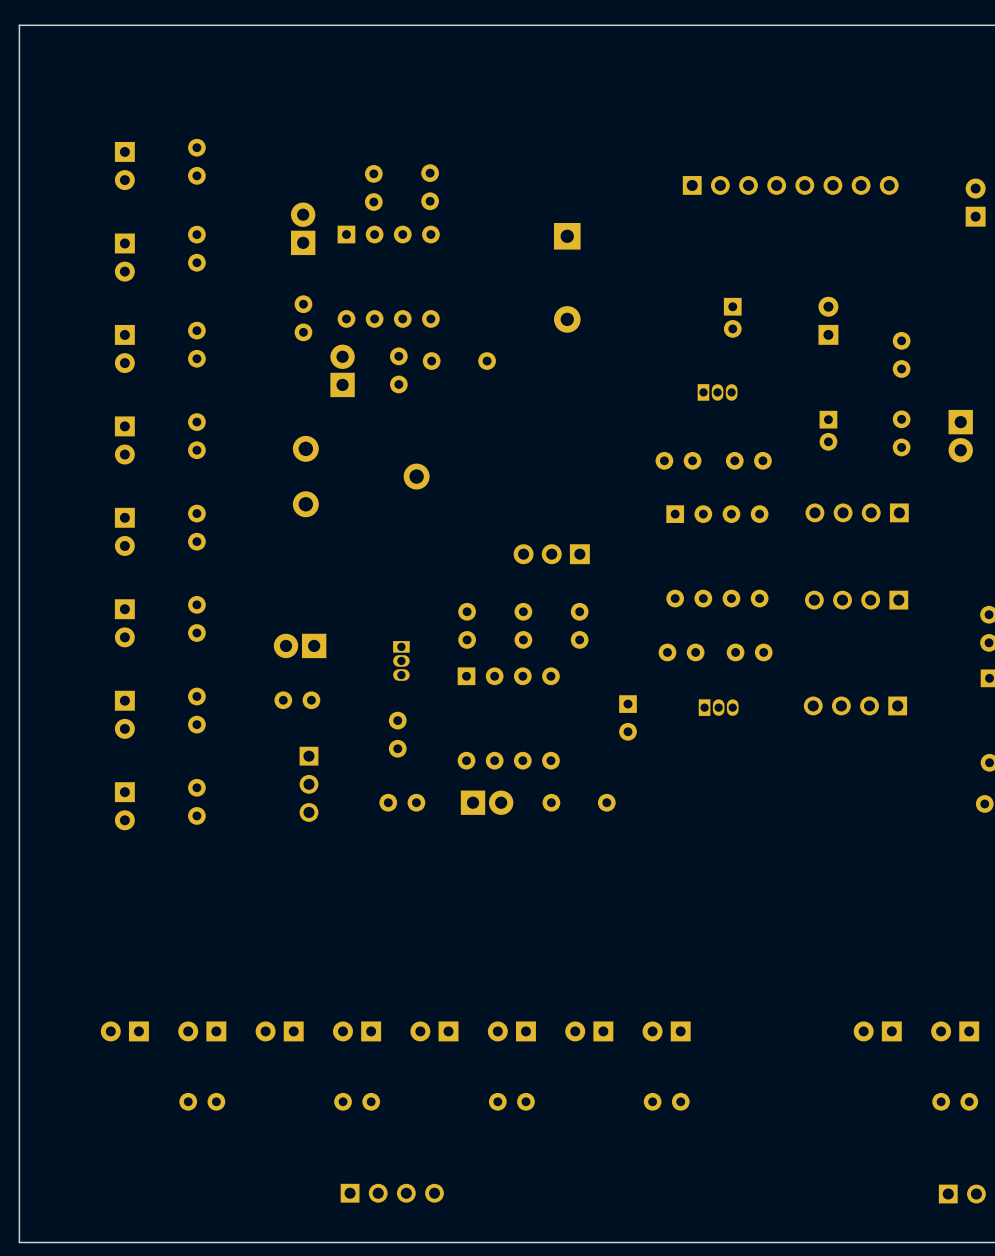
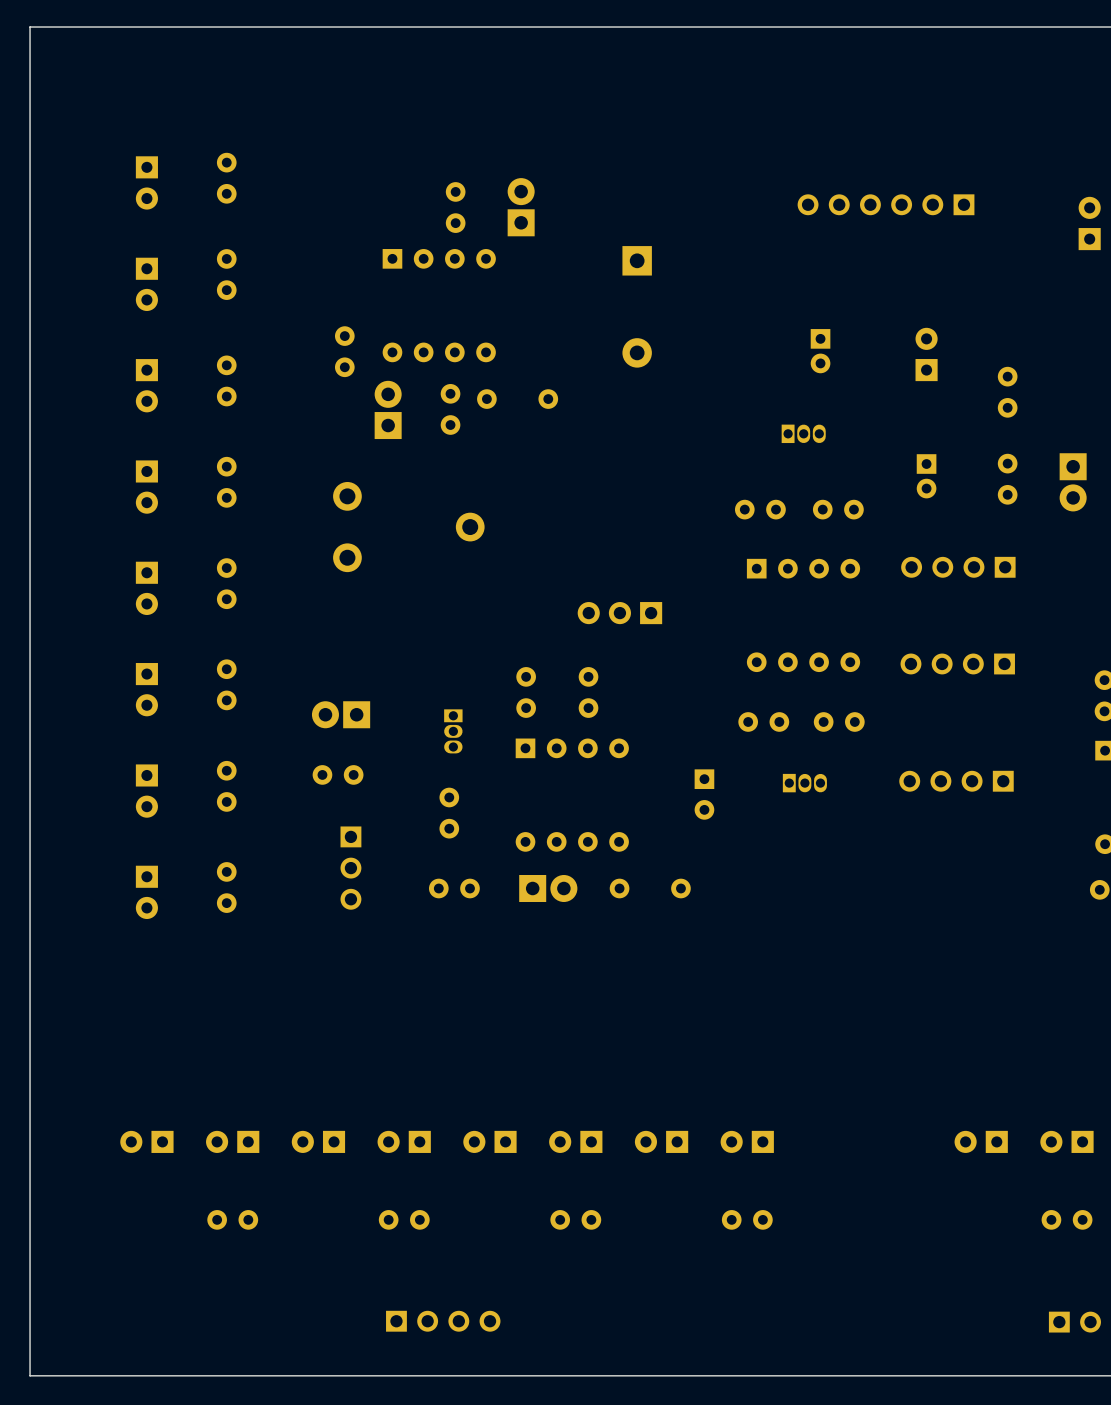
part footprint: [682, 176, 899, 195] -> [797, 194, 975, 216]
part: (373, 187) -> none
part: (430, 187) -> none
part: none -> (455, 207)
part position: (303, 228) -> (521, 207)
part: (579, 625) -> none

